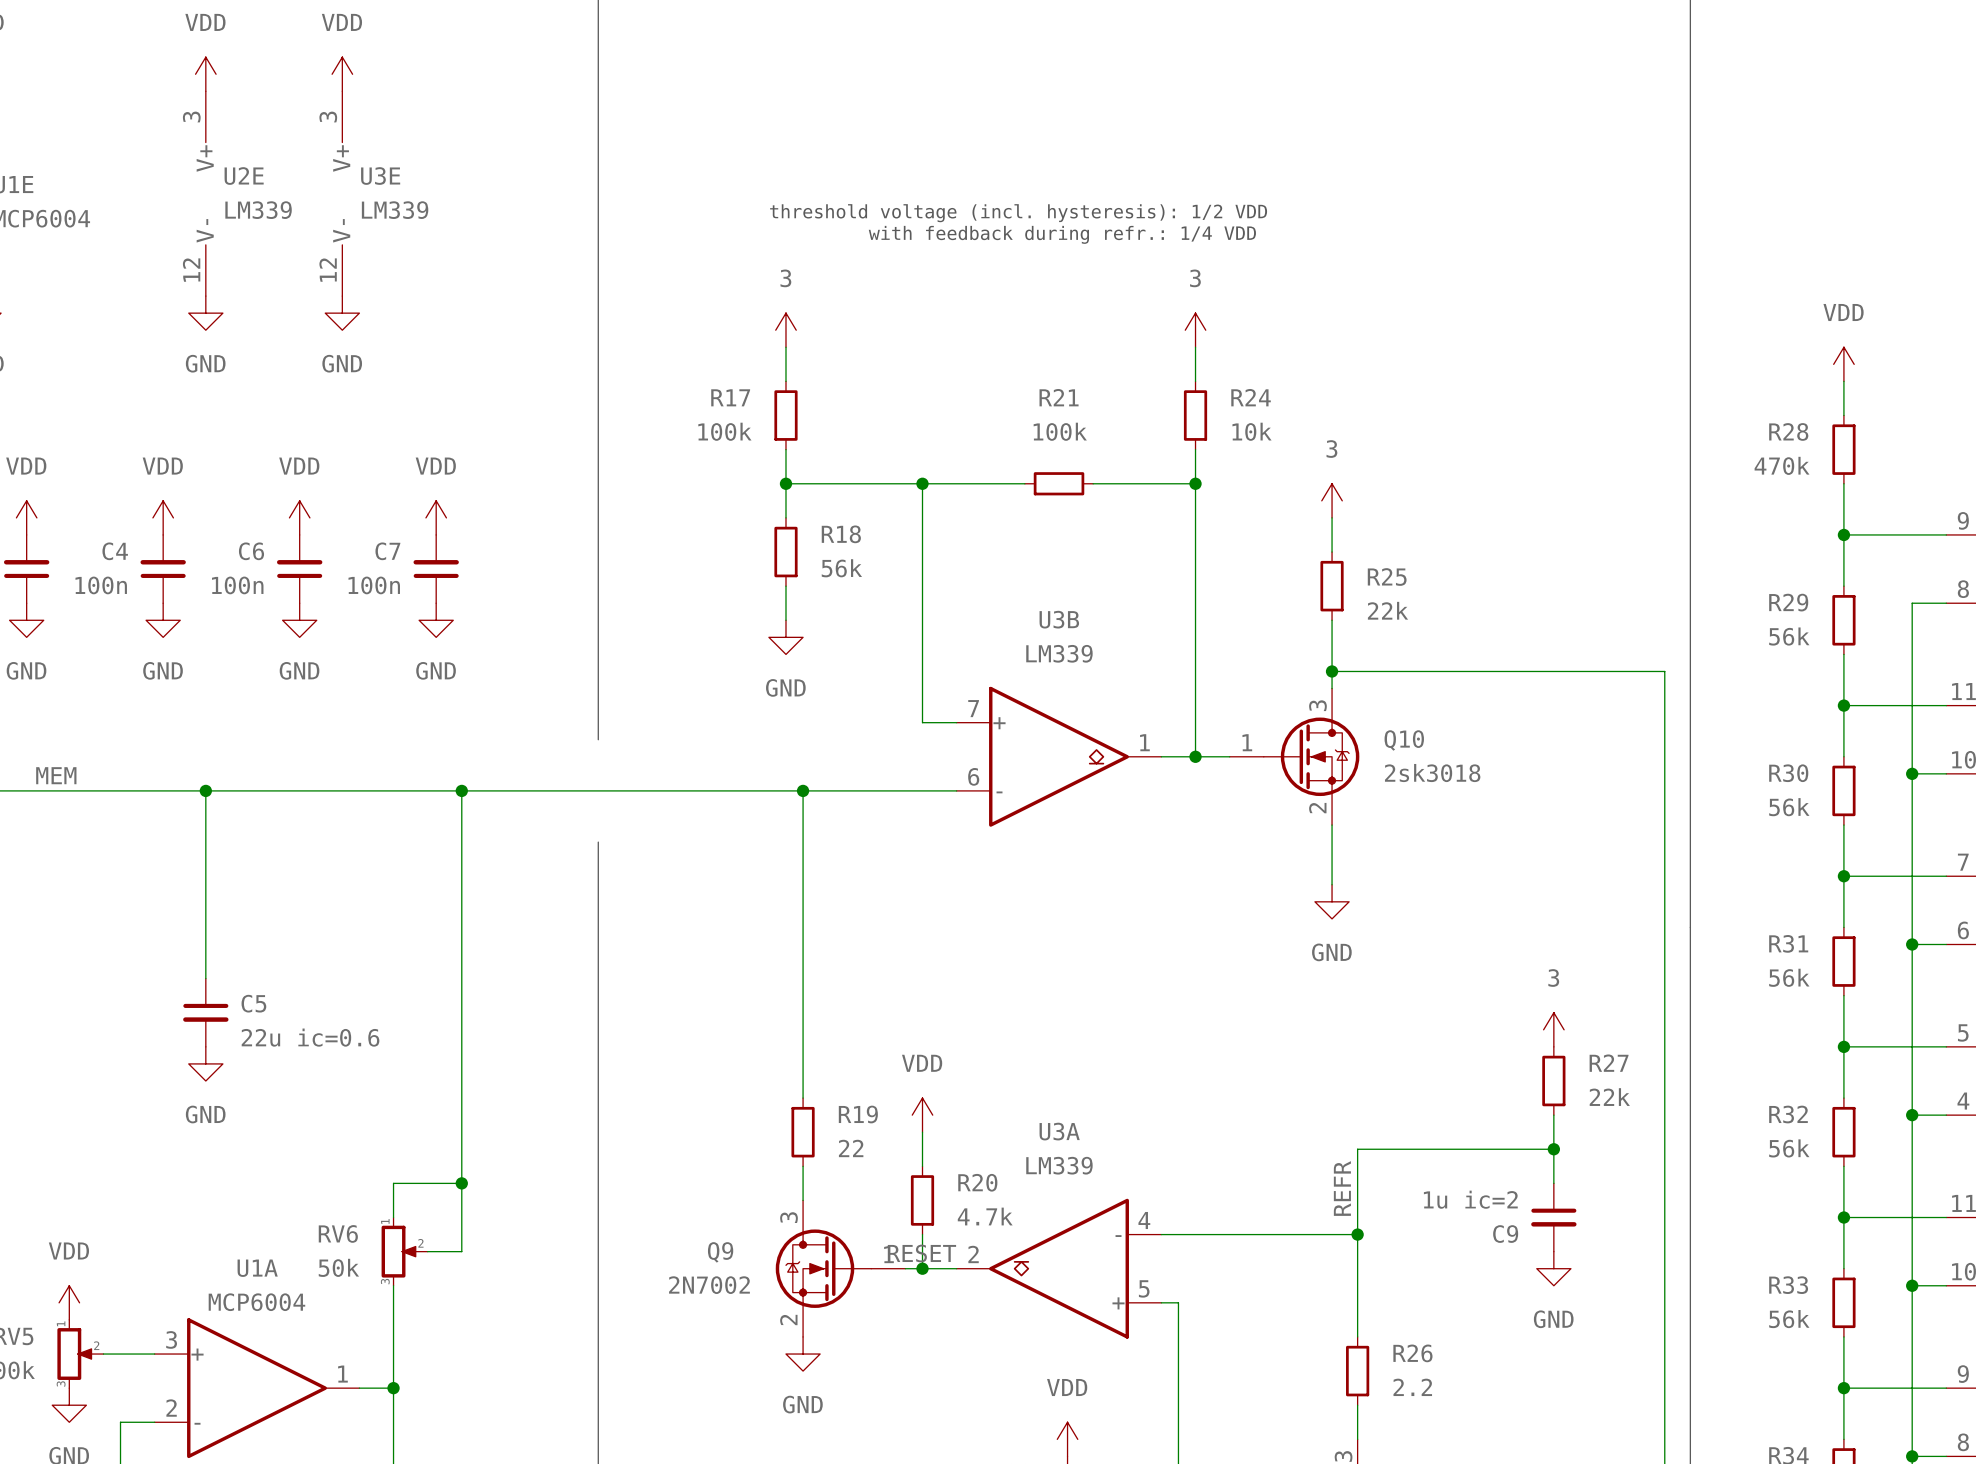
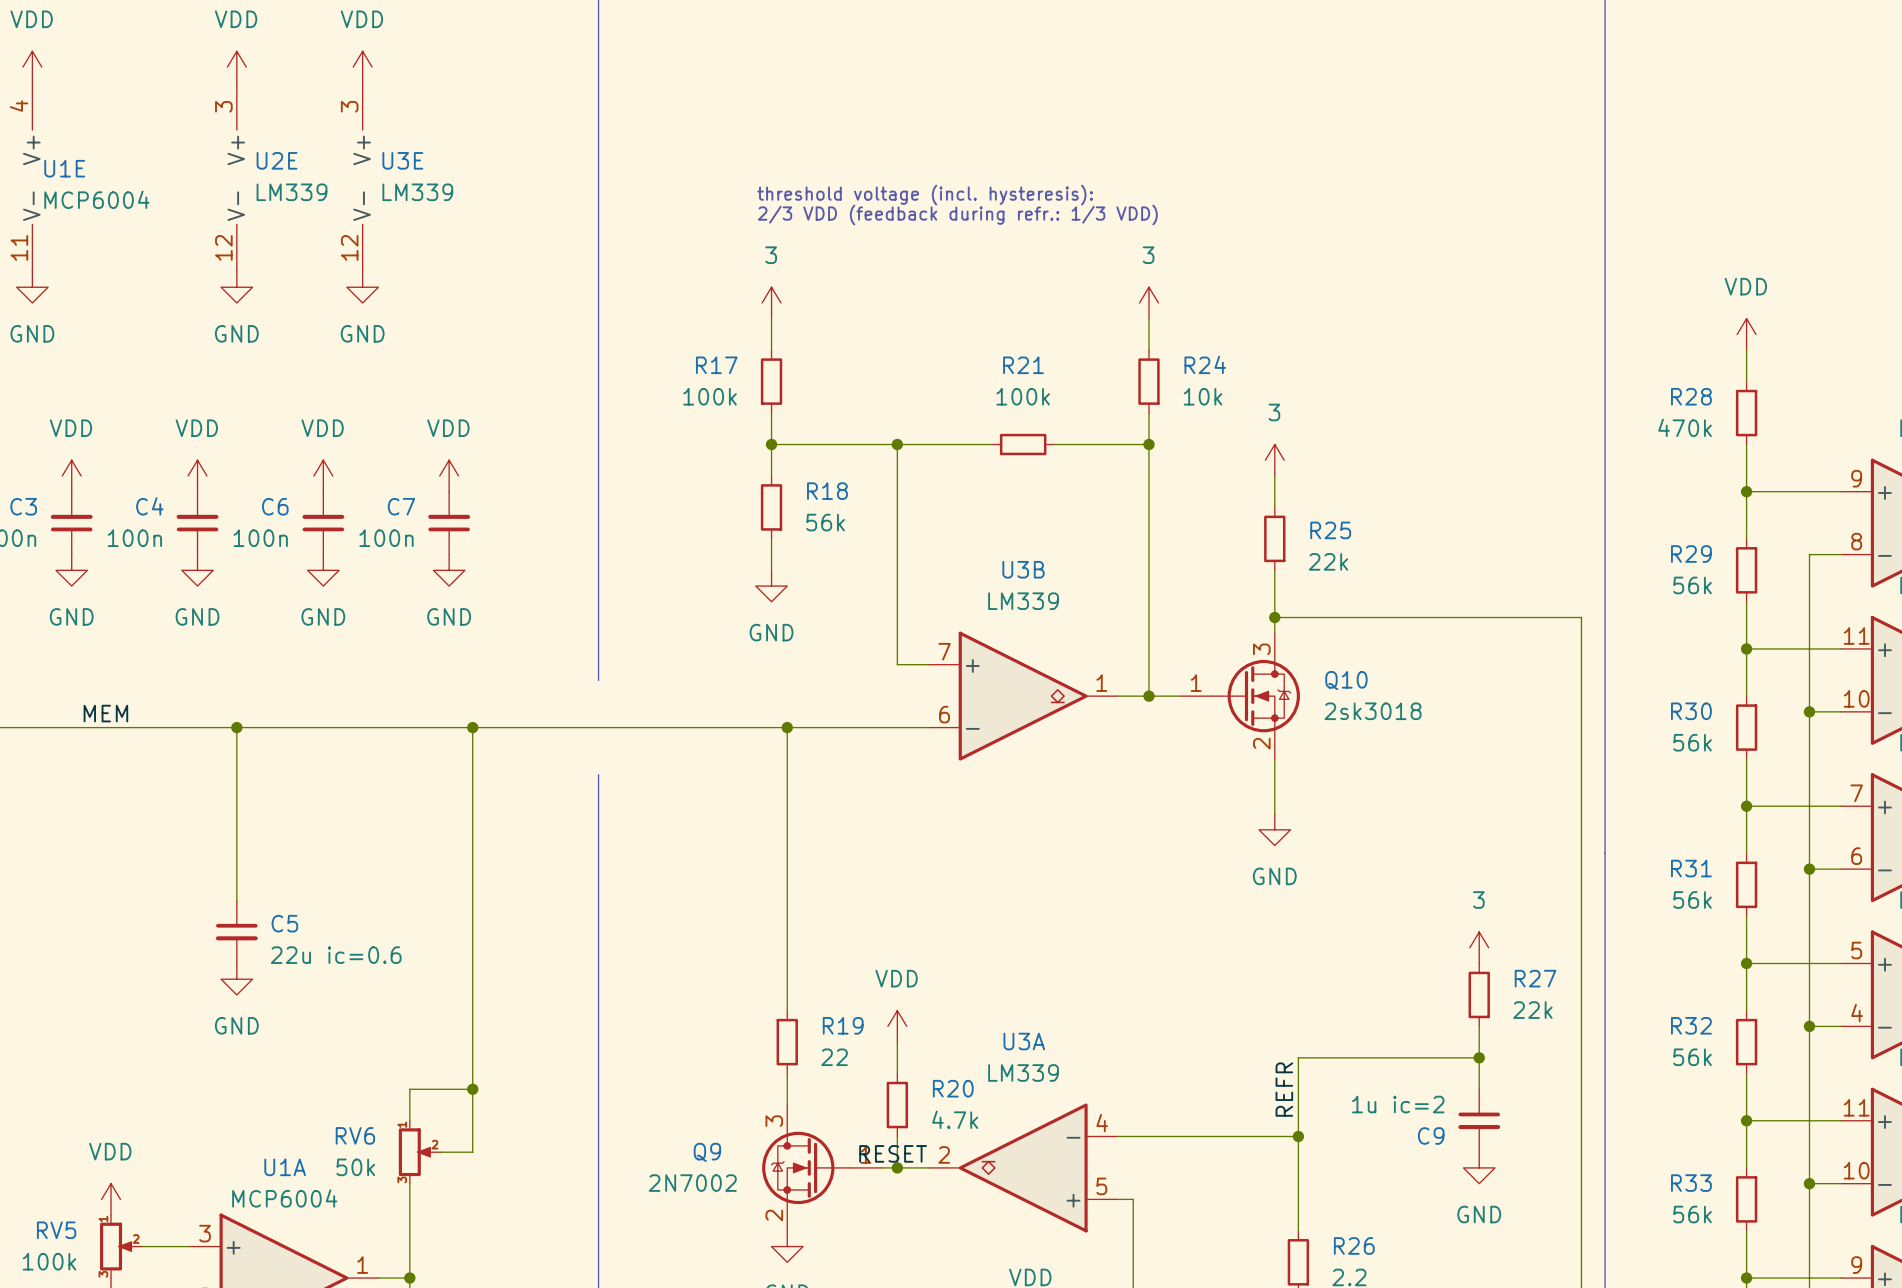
text: threshold voltage (incl. hysteresis): 1/2 VDD (1018, 213) -> threshold voltage (incl. hysteresis): (925, 195)
text: with feedback during refr.: 1/4 VDD (1062, 234) -> 2/3 VDD (feedback during refr.: 1/3 VDD) (957, 215)

